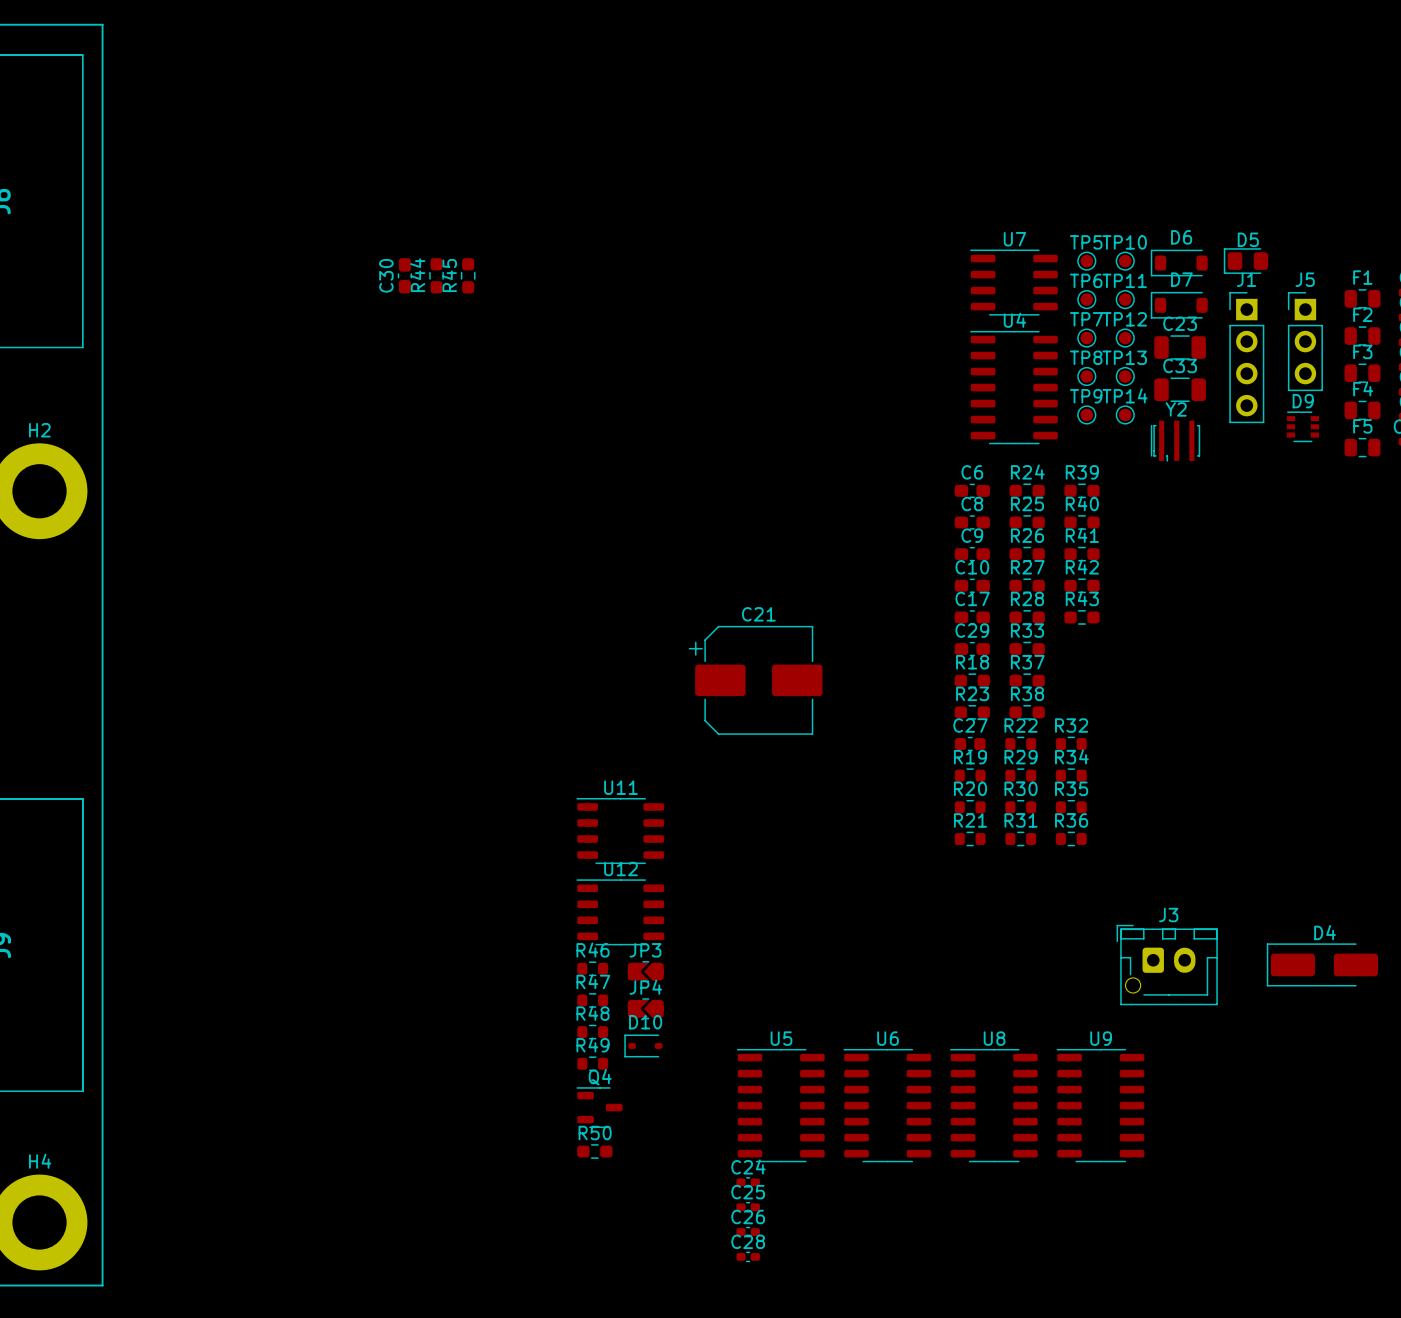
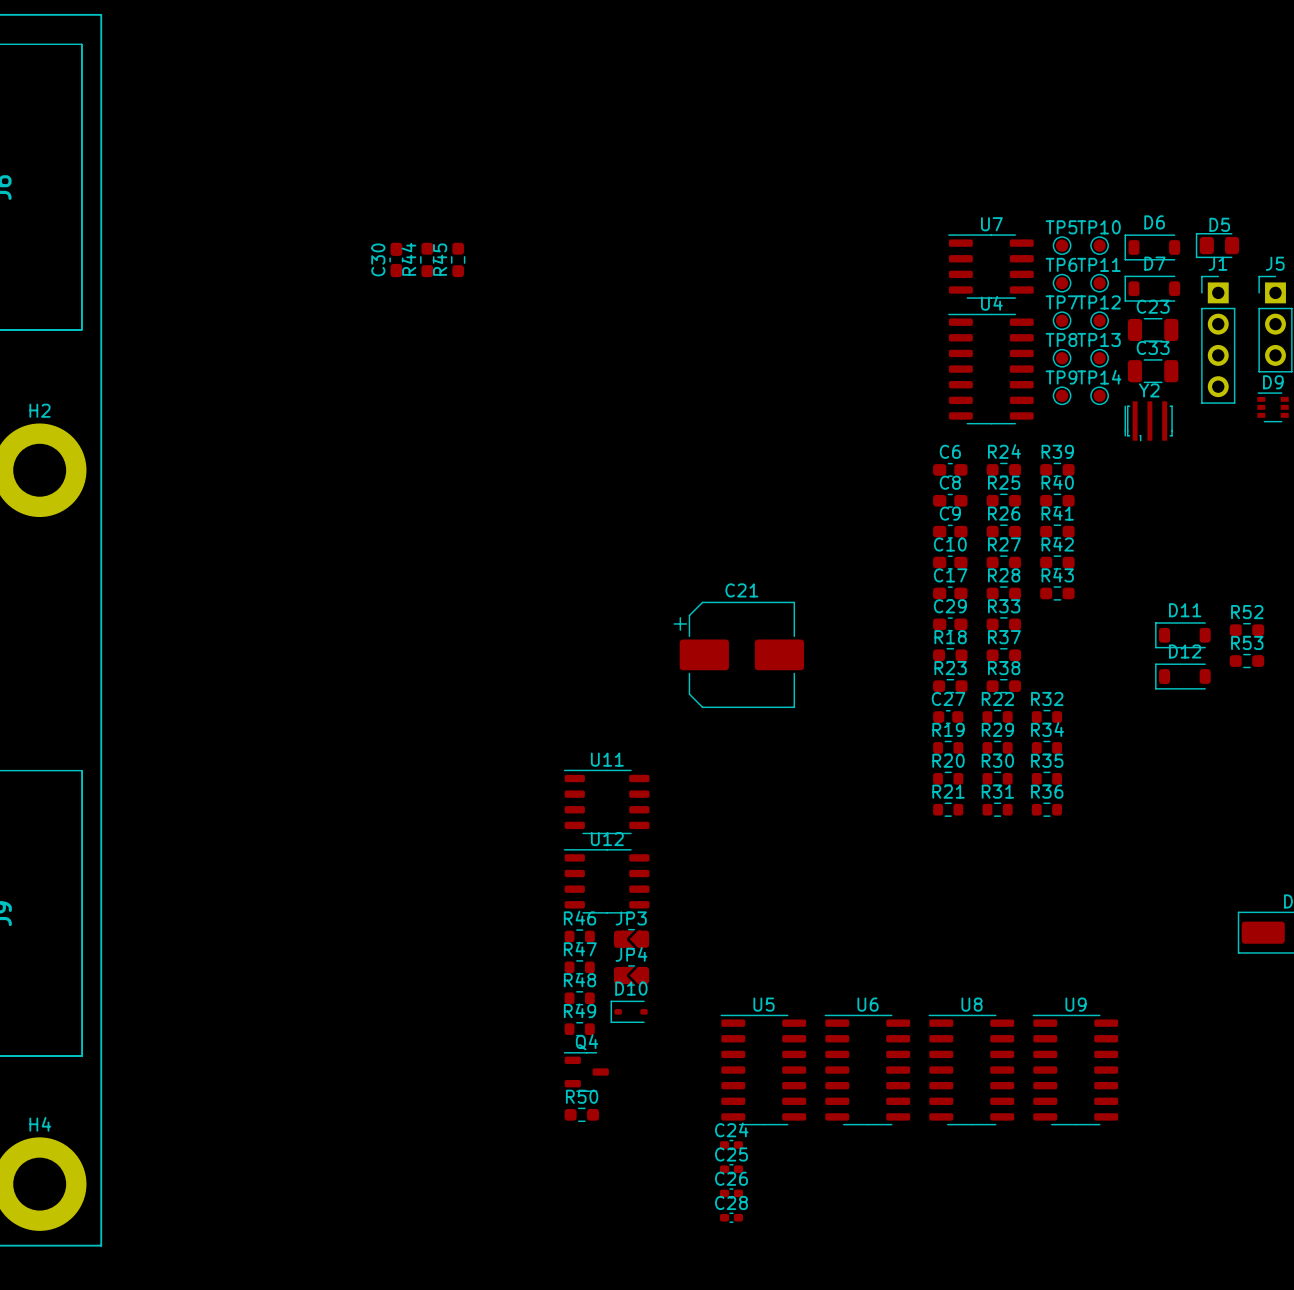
R52: none -> (1246, 630)
D11: none -> (1182, 635)
R53: none -> (1246, 661)
D12: none -> (1182, 676)
J3: (1167, 965) -> none

